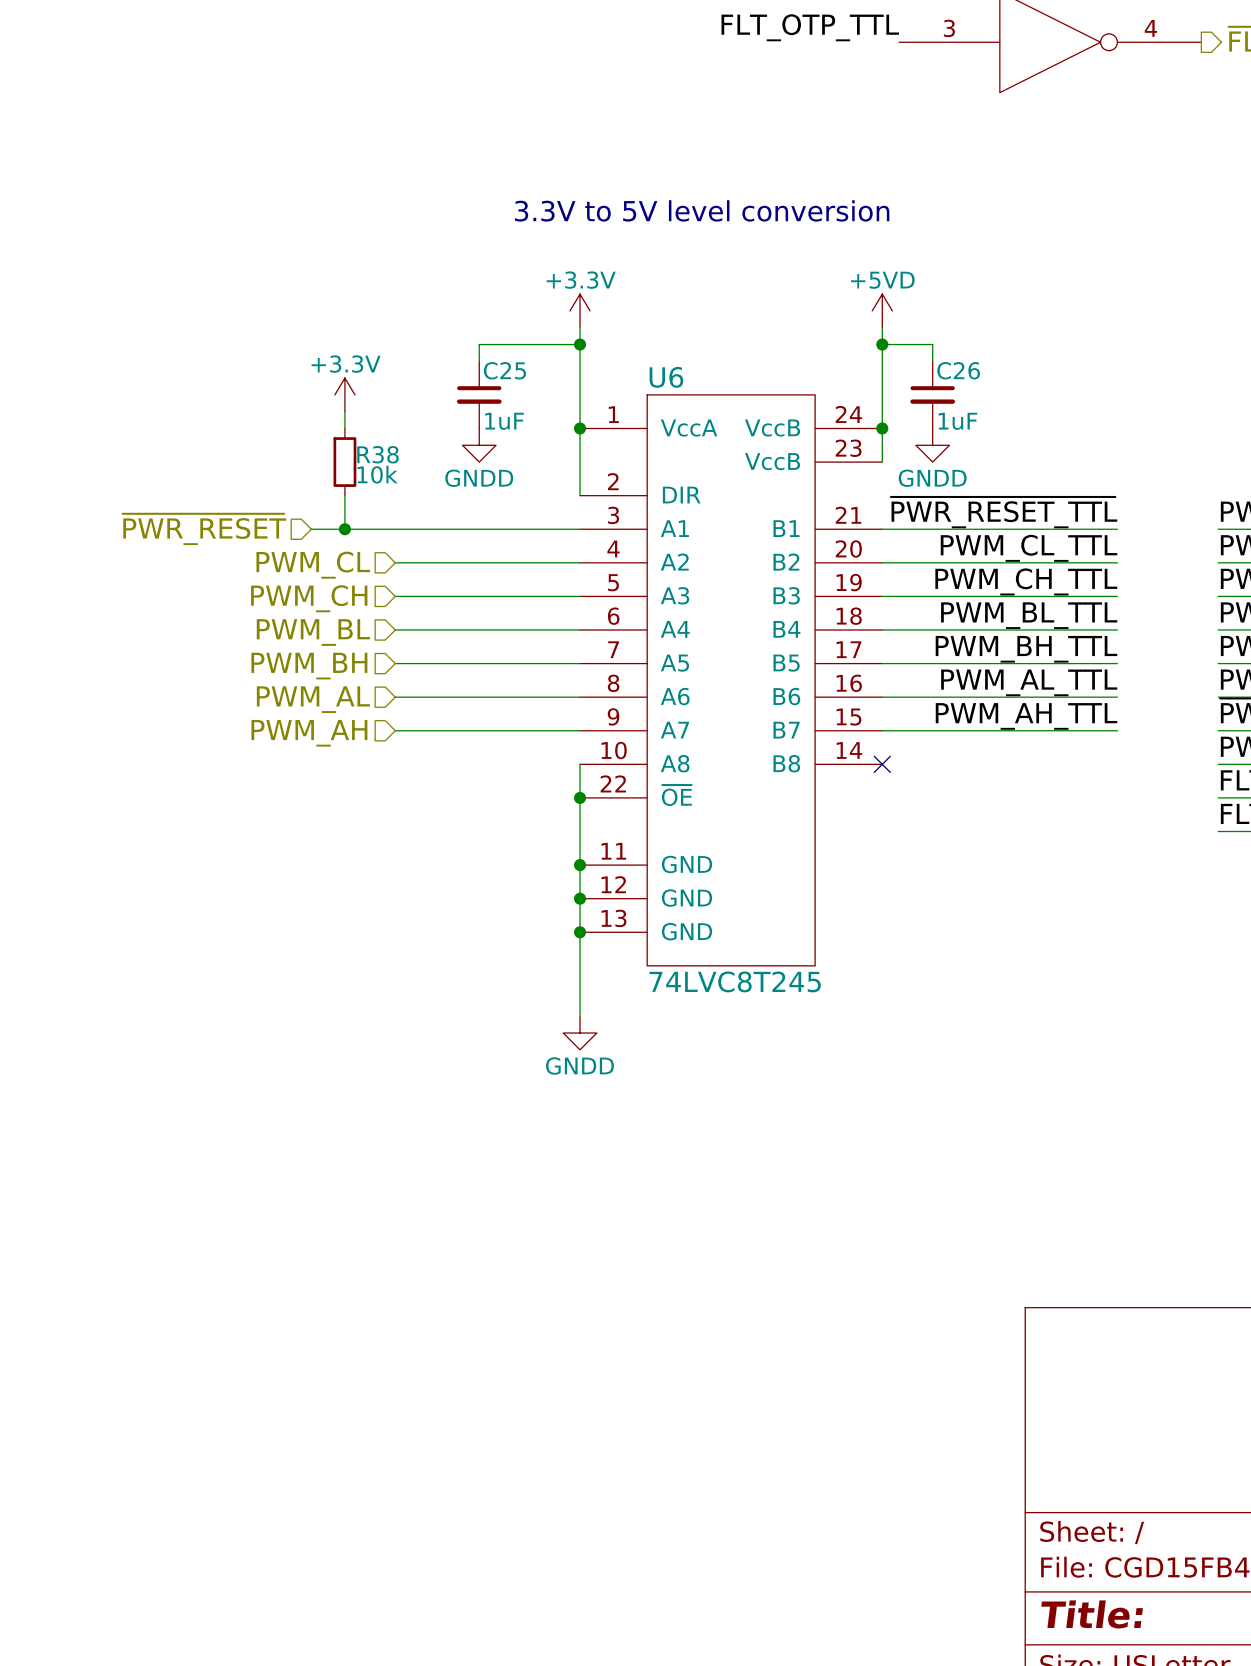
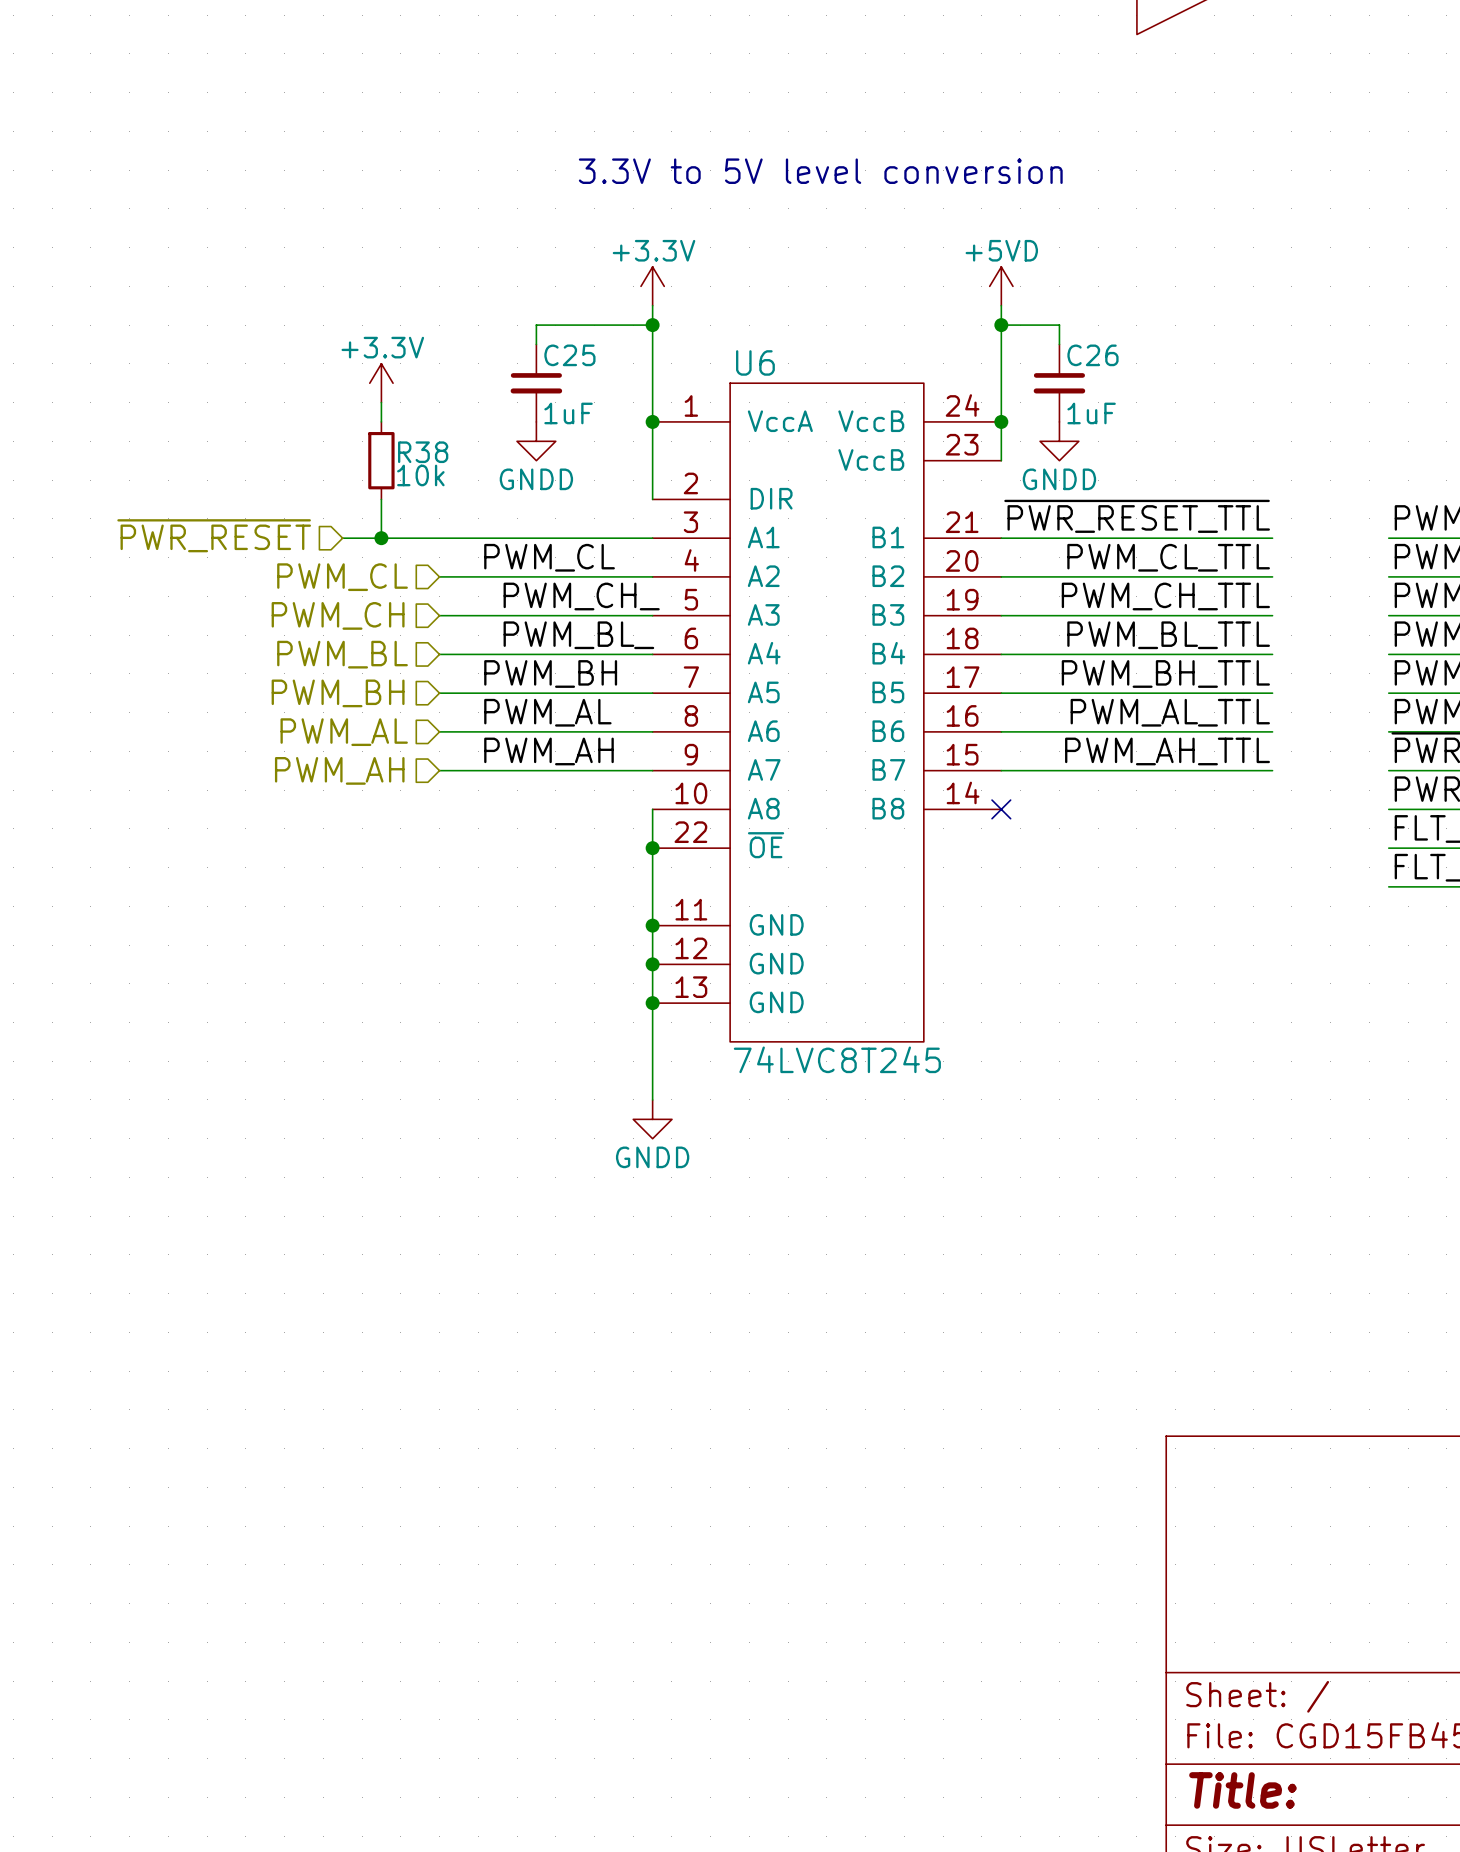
label: none -> PWM_CL (549, 557)
label: none -> PWM_CH_ (581, 596)
label: none -> PWM_BL_ (578, 635)
label: none -> PWM_BH (550, 673)
label: none -> PWM_AL (547, 712)
label: none -> PWM_AH (548, 751)

